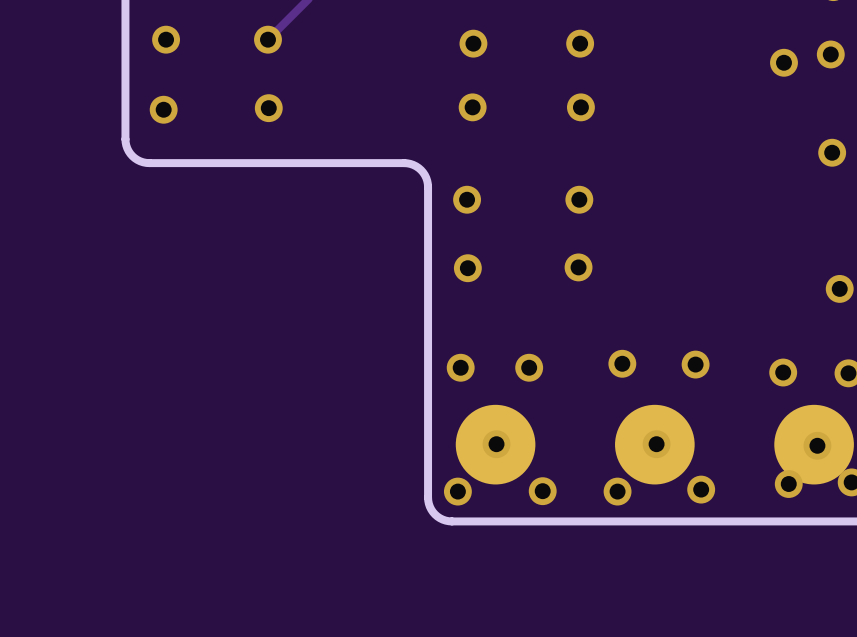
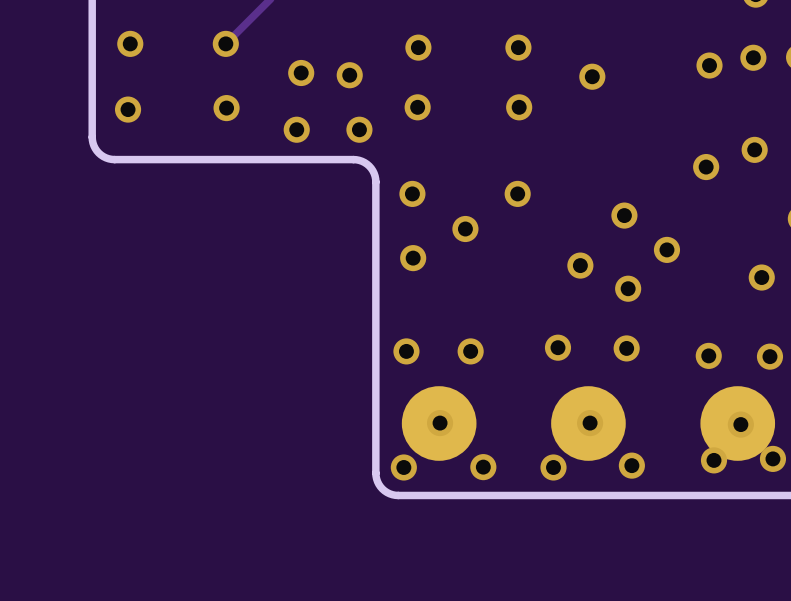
via: none -> (301, 73)
via: none -> (349, 75)
via: none -> (592, 76)
via: none -> (296, 129)
via: none -> (359, 129)
via: none -> (706, 167)
via: none -> (624, 215)
via: none -> (465, 229)
via: none -> (666, 249)
via: (578, 267) -> none
via: none -> (580, 265)
via: none -> (628, 288)

